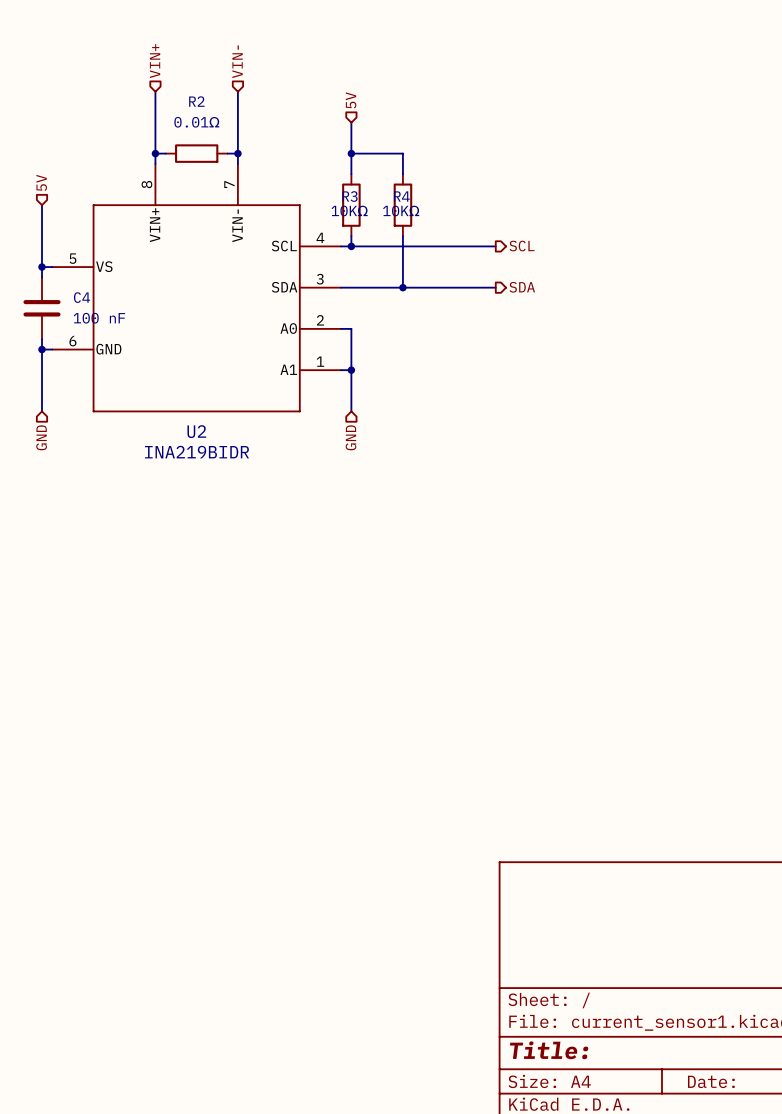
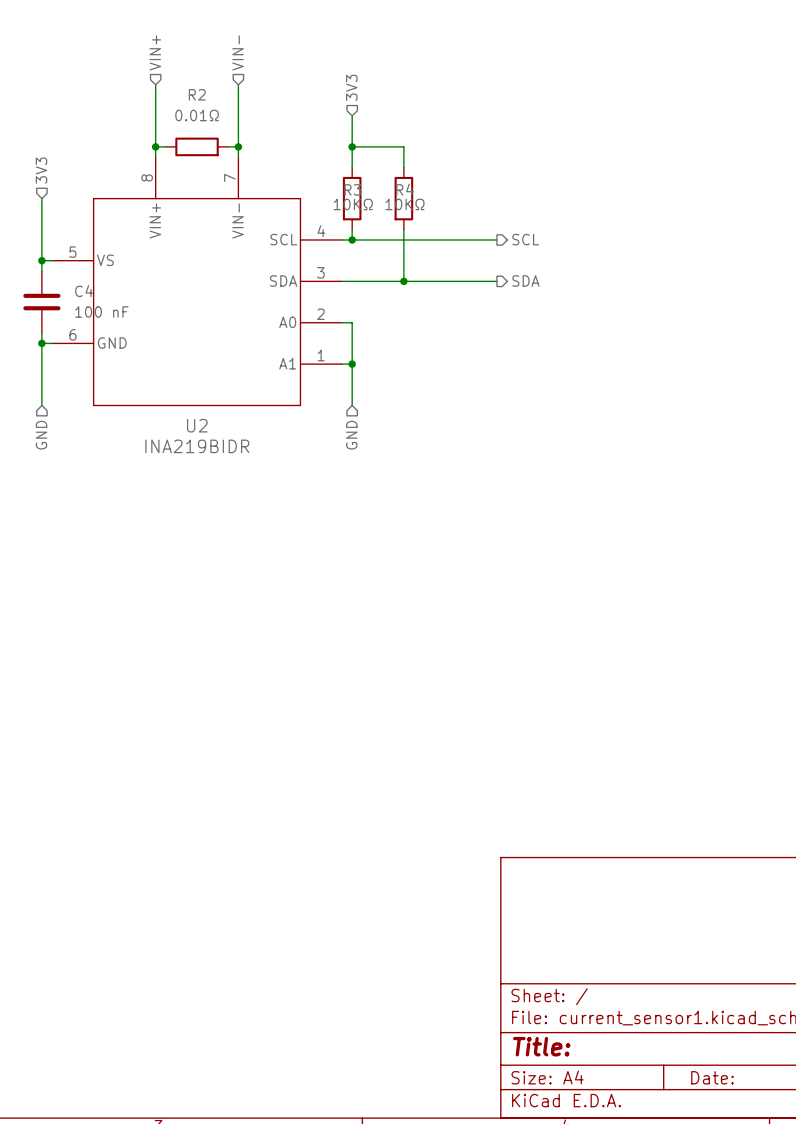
hierarchical label: 5V (351, 100) -> 3V3 (351, 87)
hierarchical label: 5V (41, 182) -> 3V3 (41, 170)

